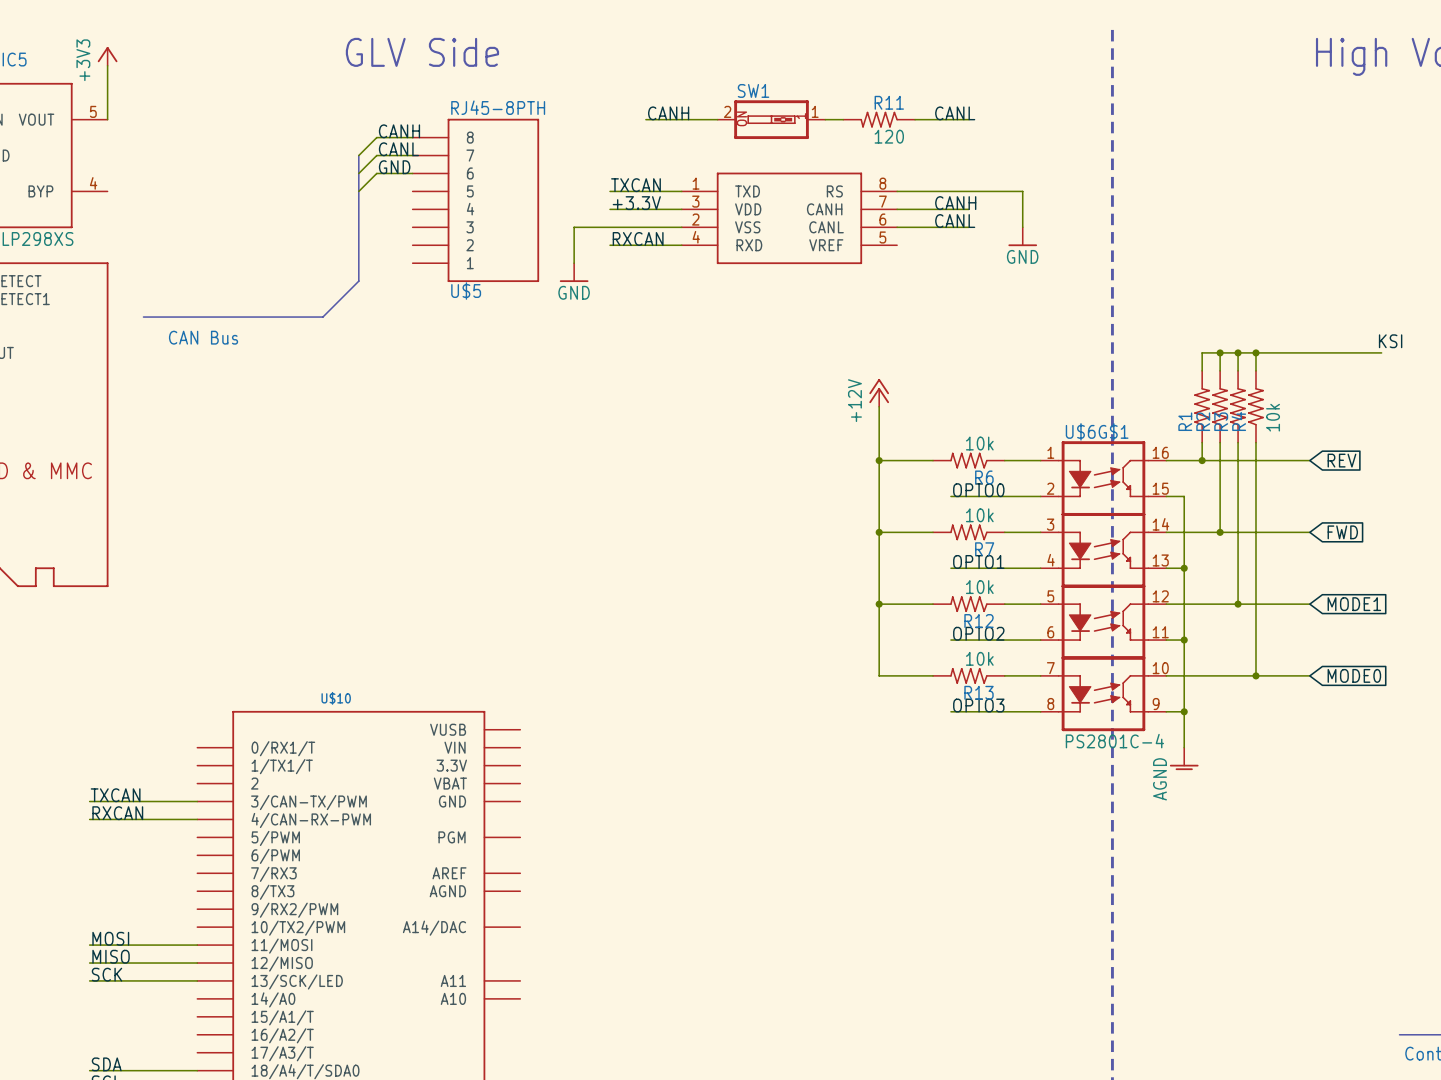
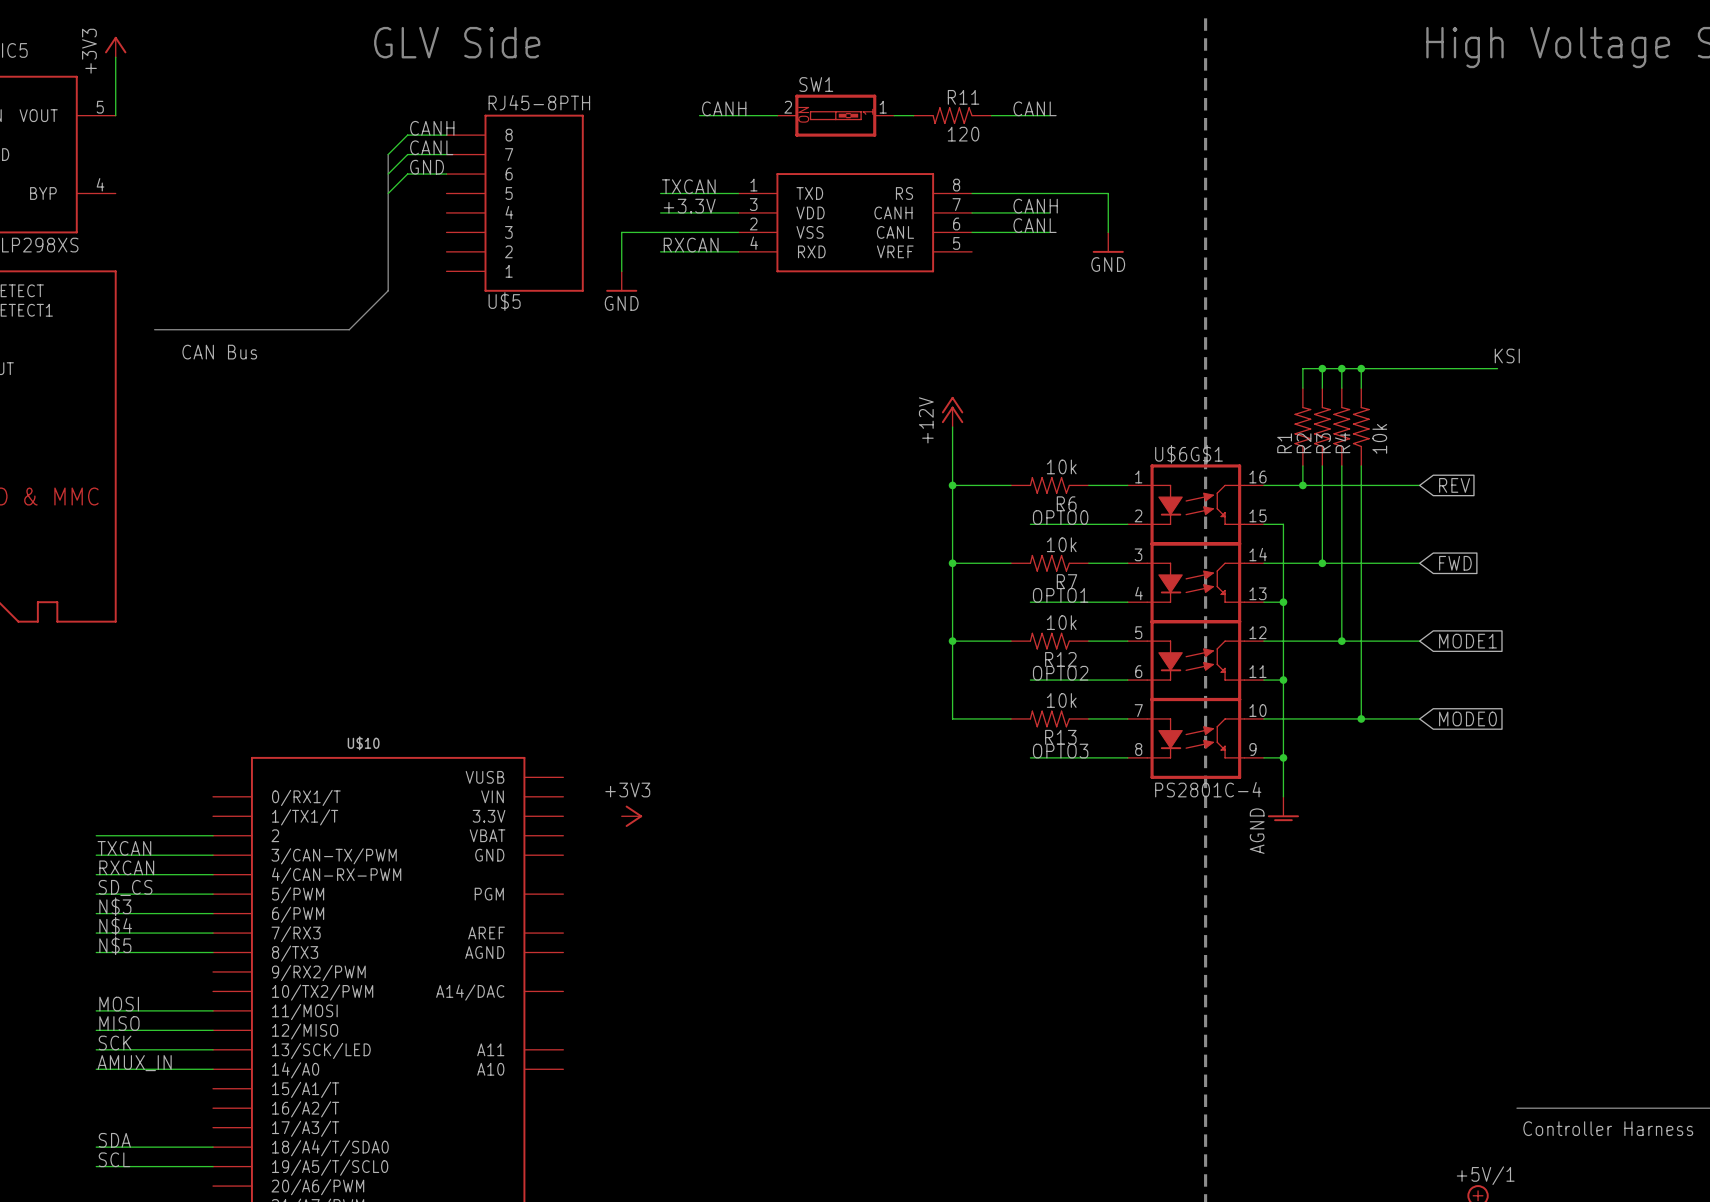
power symbol: none -> +3V3 (631, 816)
wire: none -> (96, 835) (213, 835)
label: none -> SD_CS (125, 887)
wire: none -> (96, 894) (213, 894)
label: none -> N$3 (115, 906)
wire: none -> (96, 913) (213, 913)
label: none -> N$4 (115, 926)
wire: none -> (96, 933) (213, 933)
label: none -> N$5 (115, 945)
wire: none -> (96, 952) (213, 952)
label: none -> AMUX_IN (134, 1063)
wire: none -> (96, 1069) (213, 1069)

